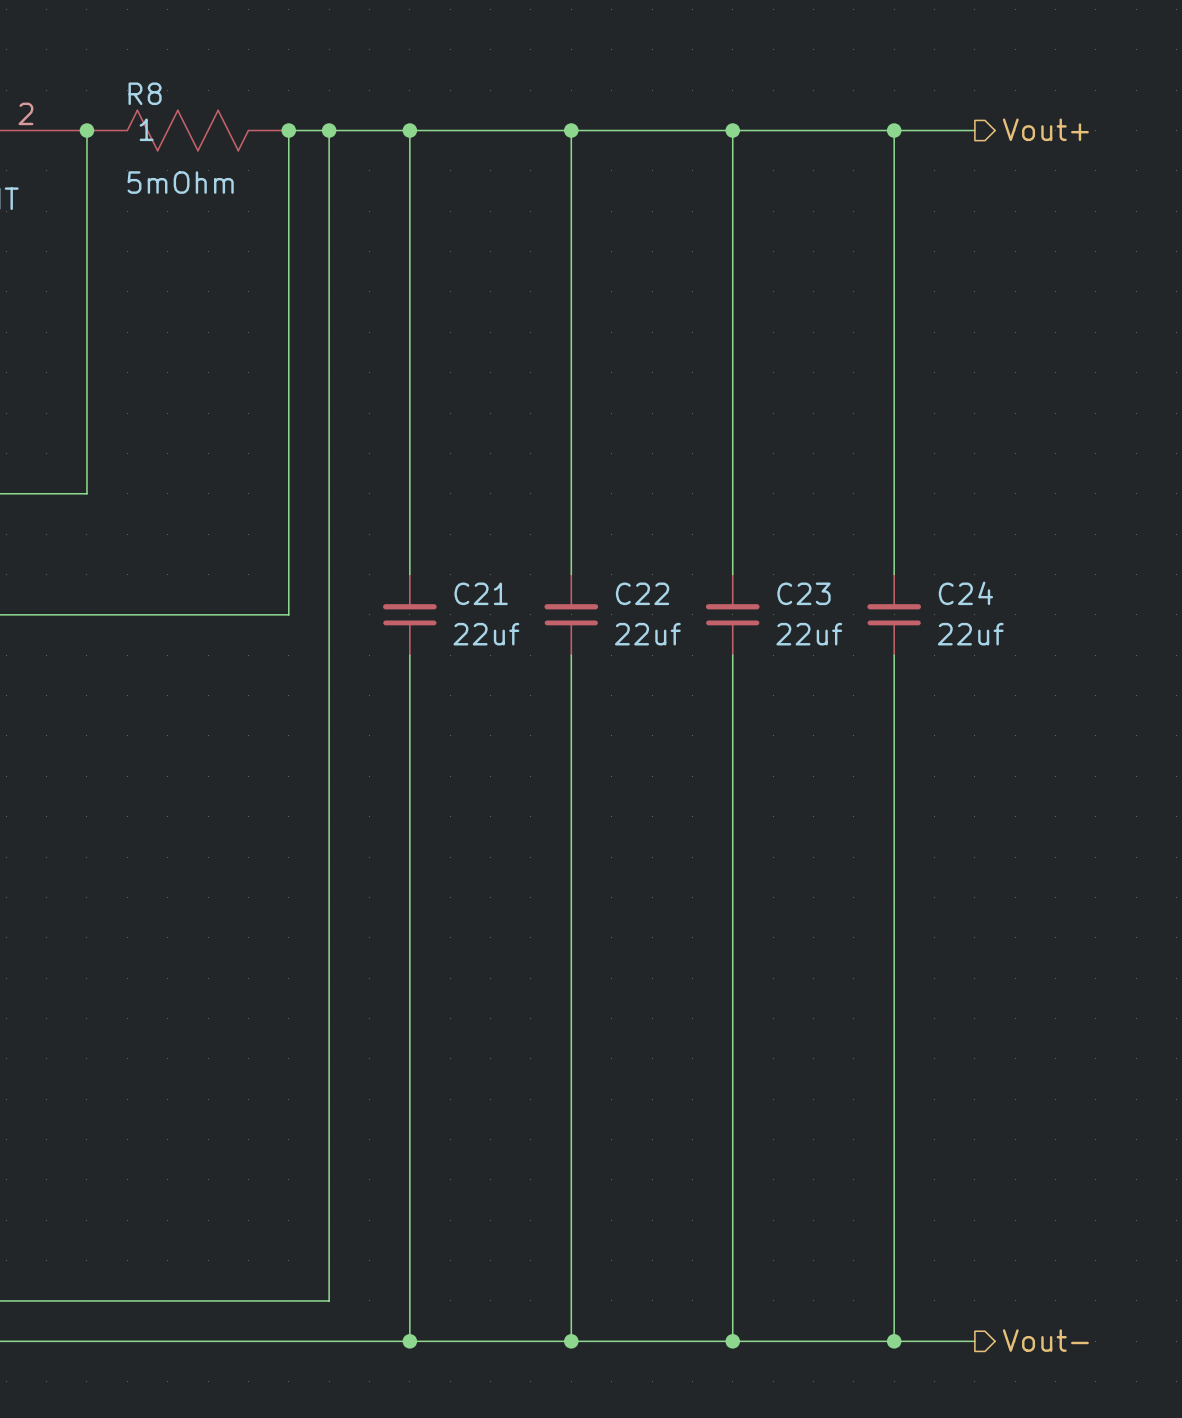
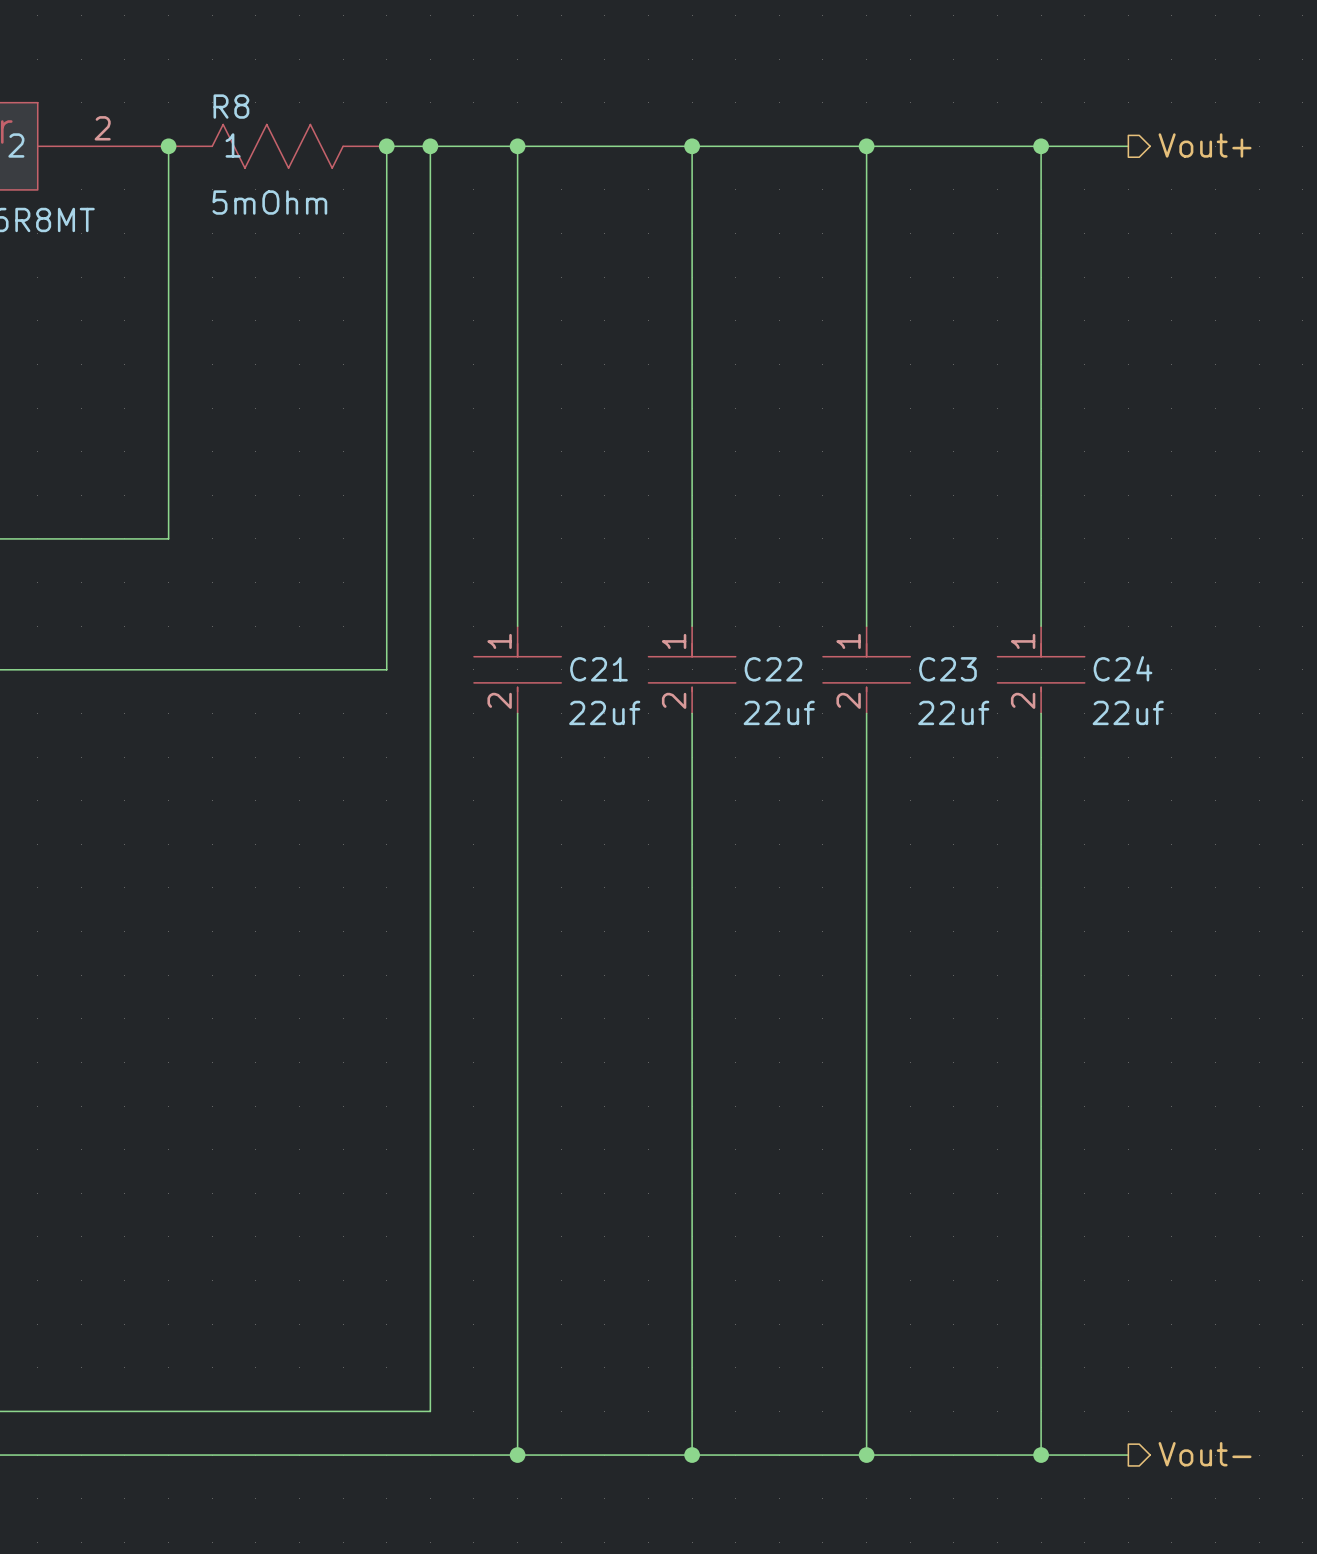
C21 symbol: [383, 574, 437, 656] -> [473, 626, 562, 714]
C22 symbol: [544, 574, 599, 656] -> [648, 626, 736, 714]
C23 symbol: [705, 574, 760, 656] -> [822, 626, 911, 714]
C24 symbol: [867, 574, 922, 656] -> [997, 626, 1085, 714]

